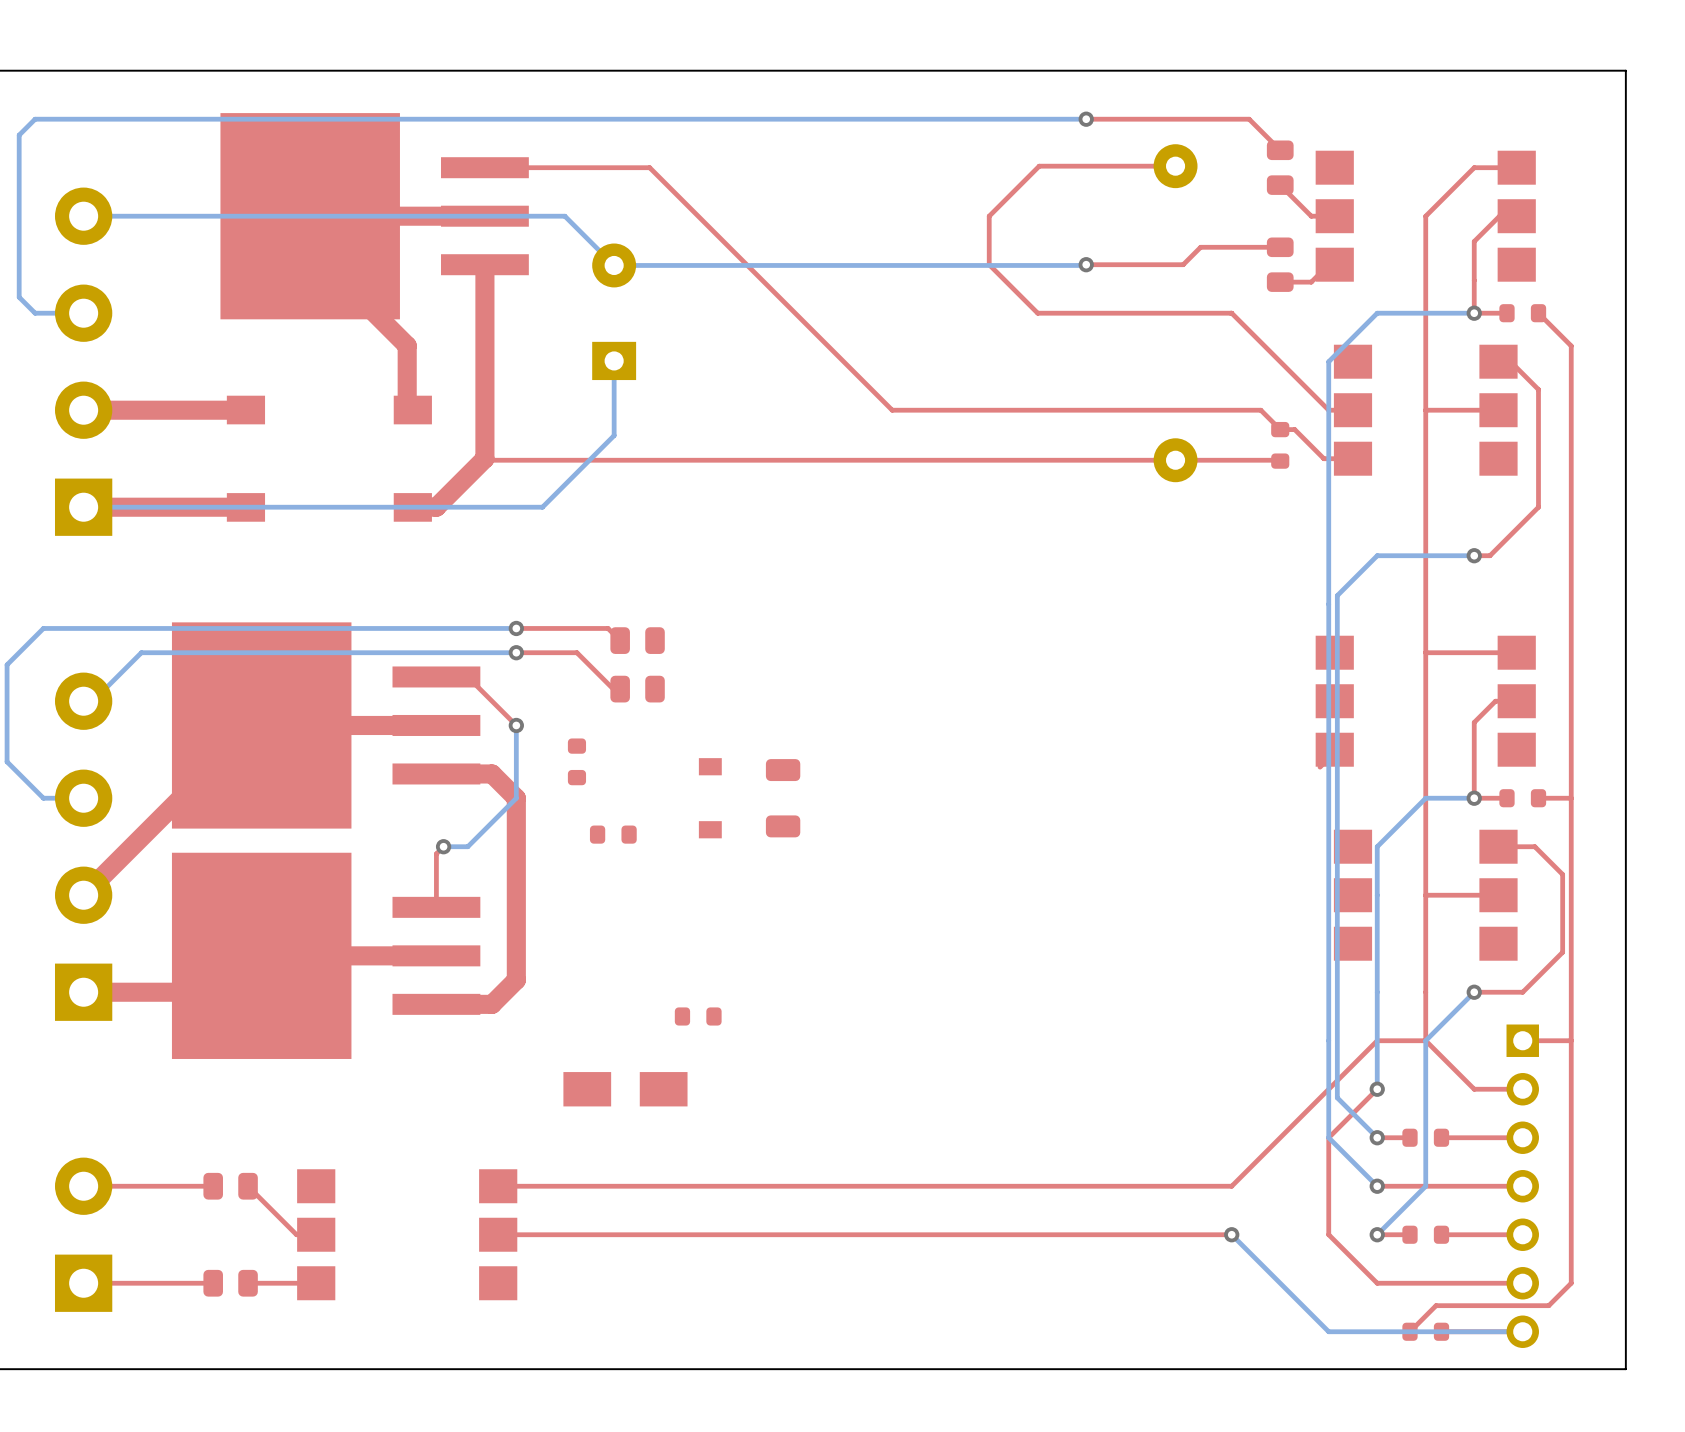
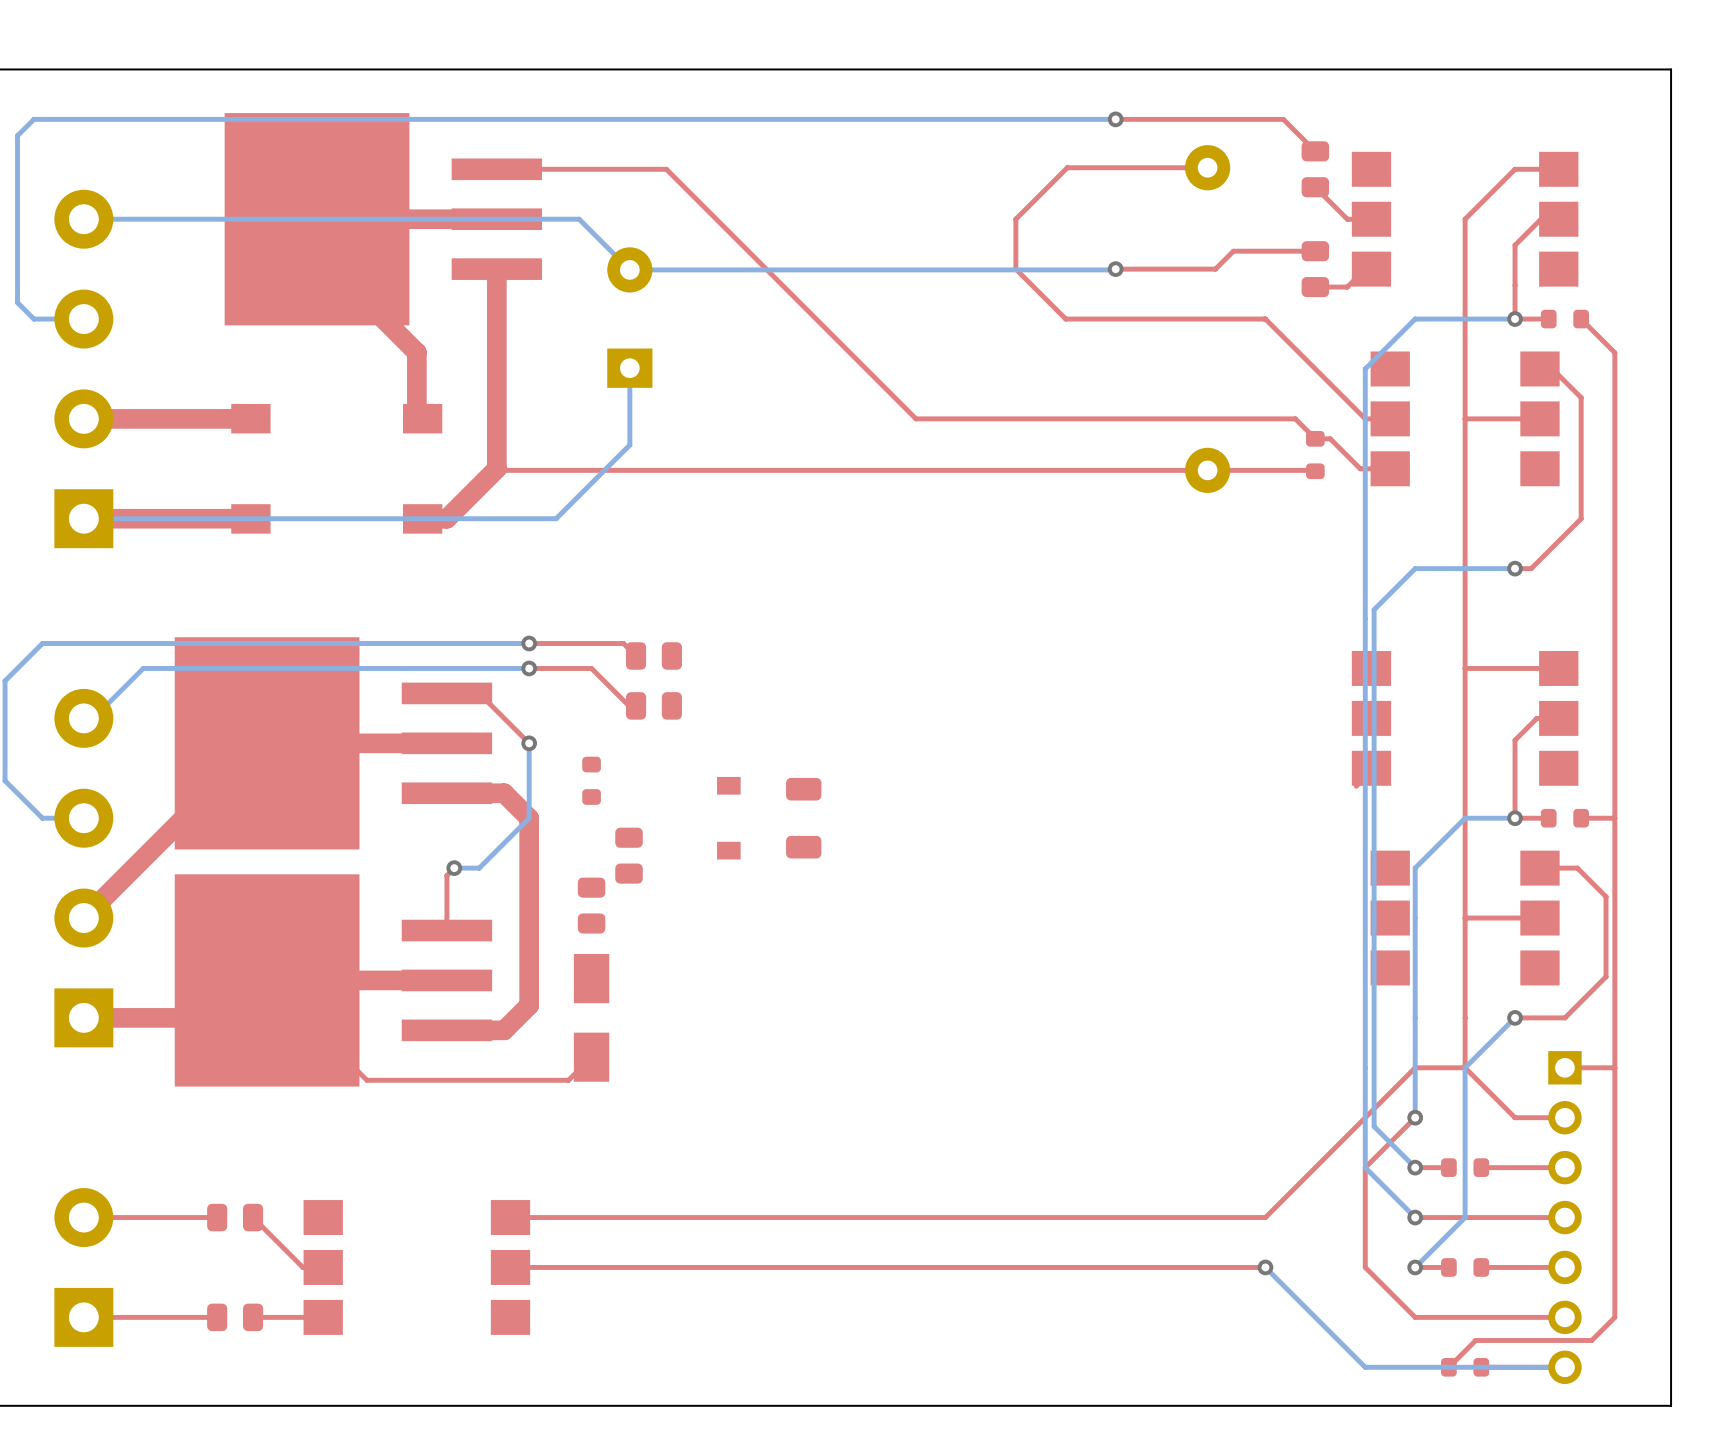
part footprint: [589, 825, 637, 844] -> [615, 827, 643, 884]
part: none -> (591, 905)
top track: none -> (267, 980) (366, 1080) (568, 1080) (591, 1057)
part: (698, 1016) -> none
part rotation: 0° (625, 1089) -> 90° clockwise (591, 1017)
part position: (625, 1089) -> (591, 1017)

